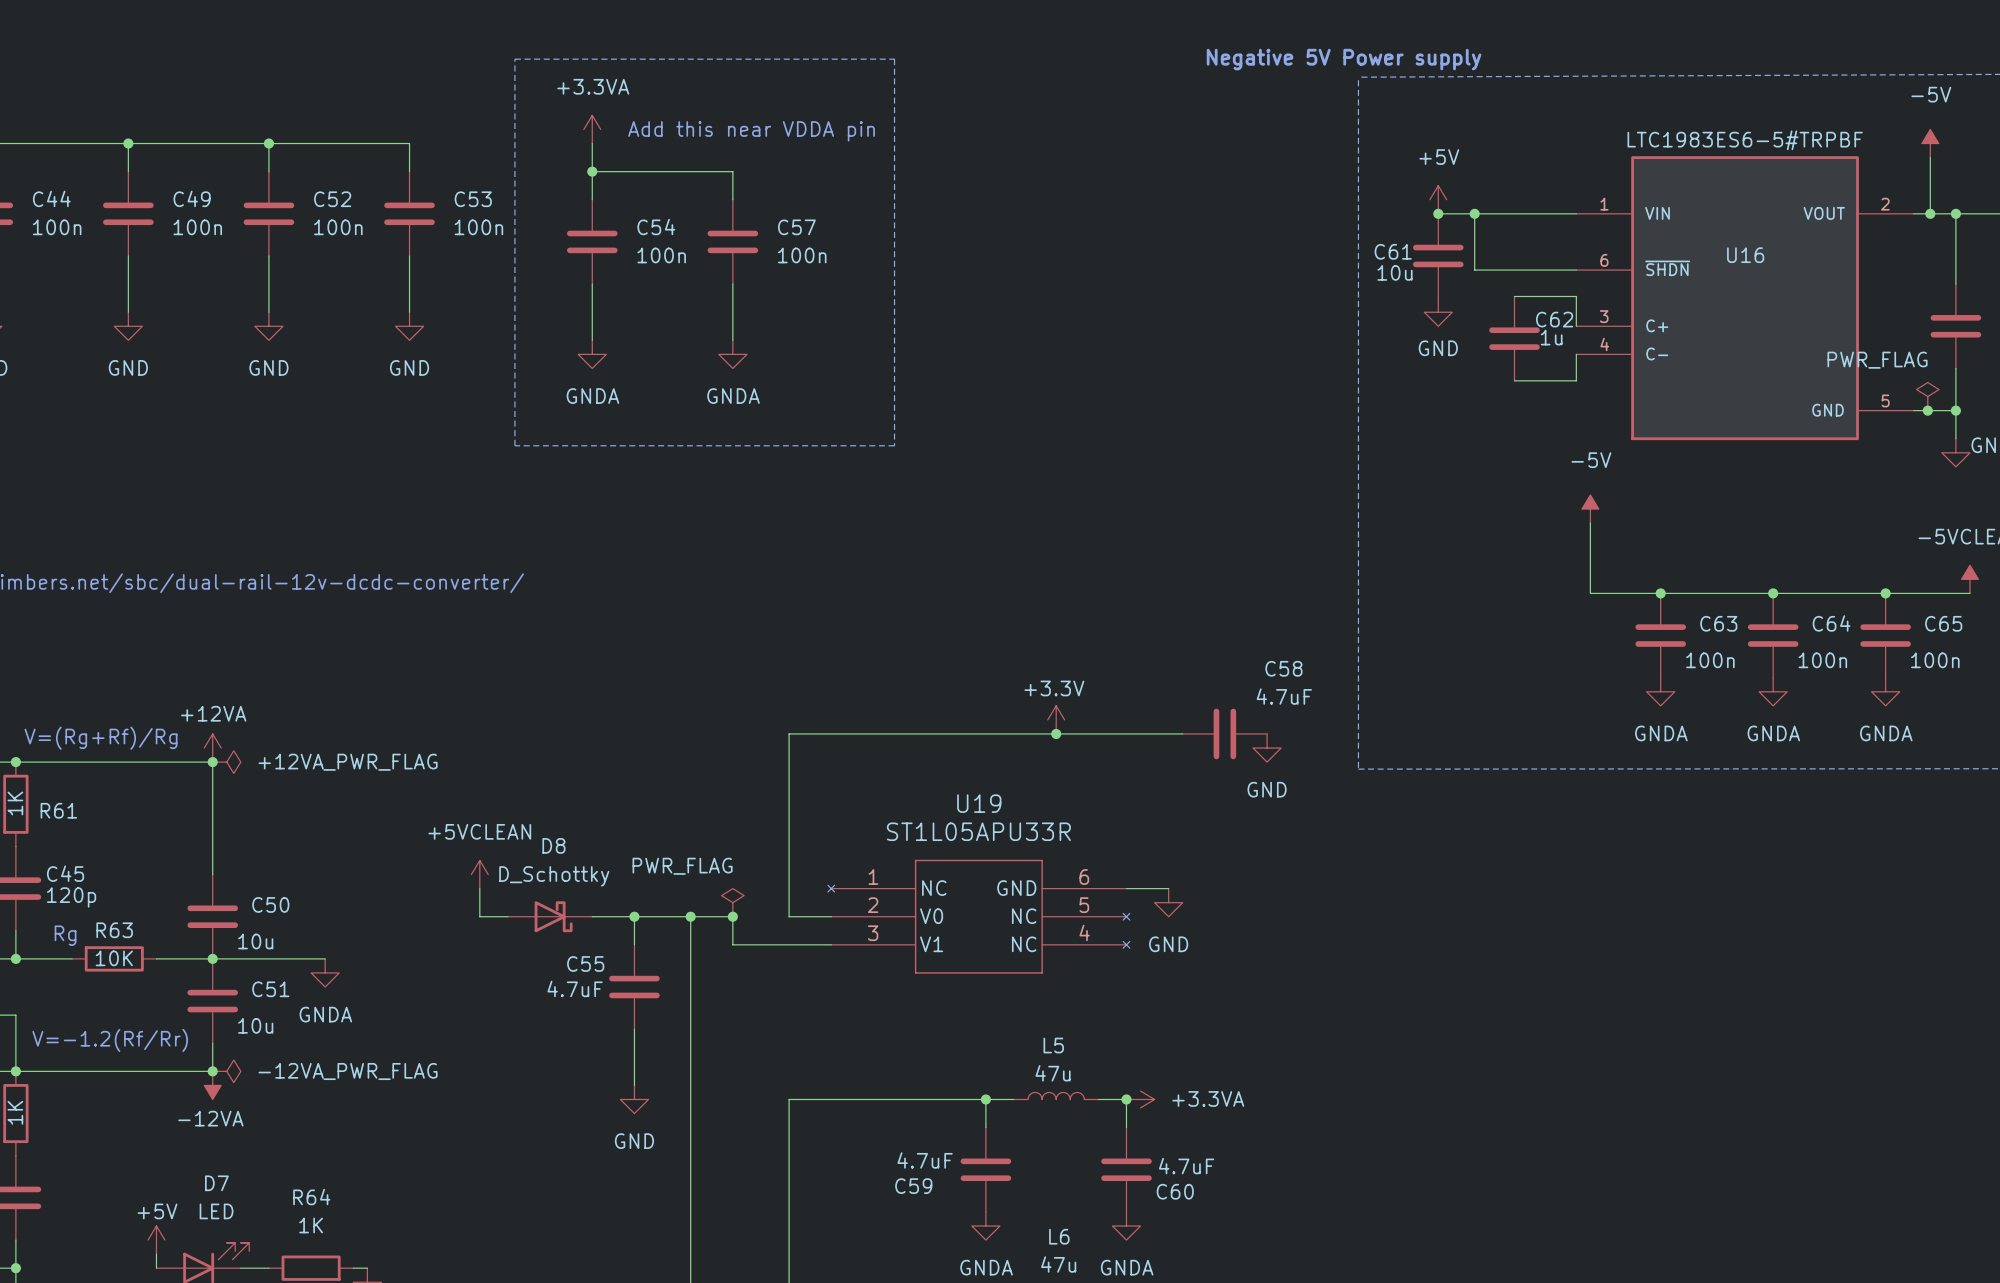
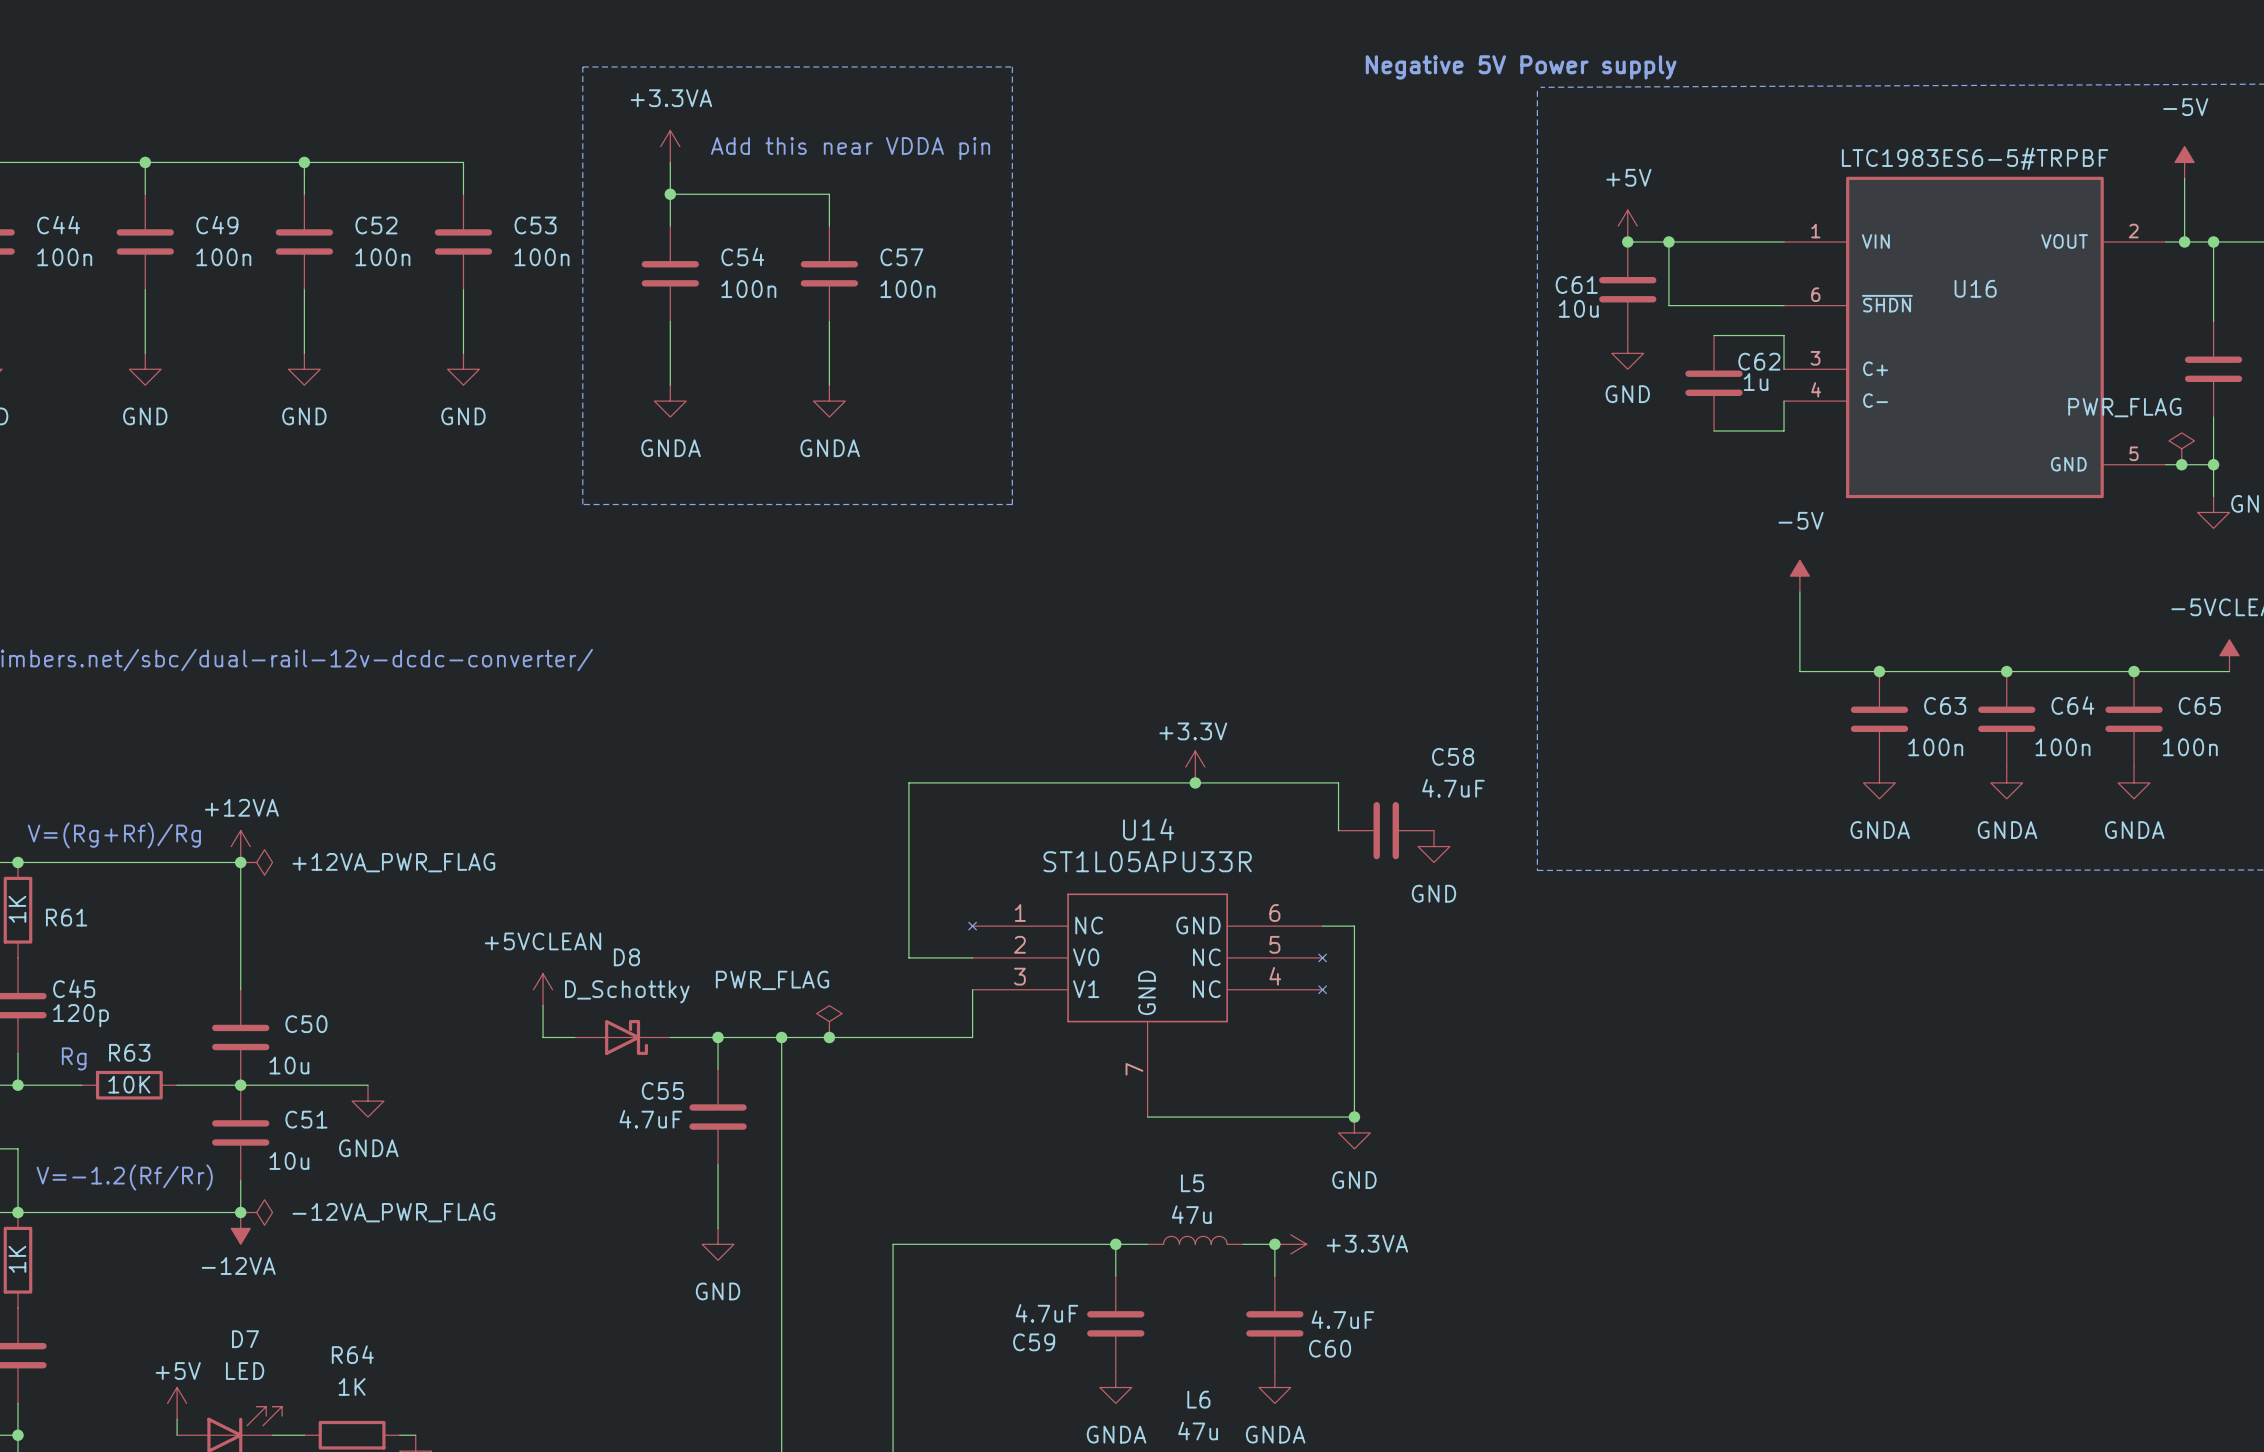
power symbol position: +3.3V (1056, 719) -> +3.3V (1195, 767)
junction position: (1056, 733) -> (1195, 782)
wire: (1182, 733) (789, 733) (789, 916) -> (1338, 830) (1338, 782) (908, 782) (908, 957) (972, 957)
wire: none -> (1322, 926) (1354, 926) (1354, 1117) (1147, 1117)
wire: none -> (972, 989) (972, 1037) (940, 1037)
U14: none -> ST1L05APU33R (1147, 1005)
wire: (1126, 888) (1168, 888) -> none
power symbol position: GND (1168, 902) -> GND (1354, 1132)
wire: (732, 916) (732, 944) (831, 944) -> (829, 1037) (893, 1037)
U19: ST1L05APU33R (978, 916) -> none
junction: none -> (1354, 1117)

